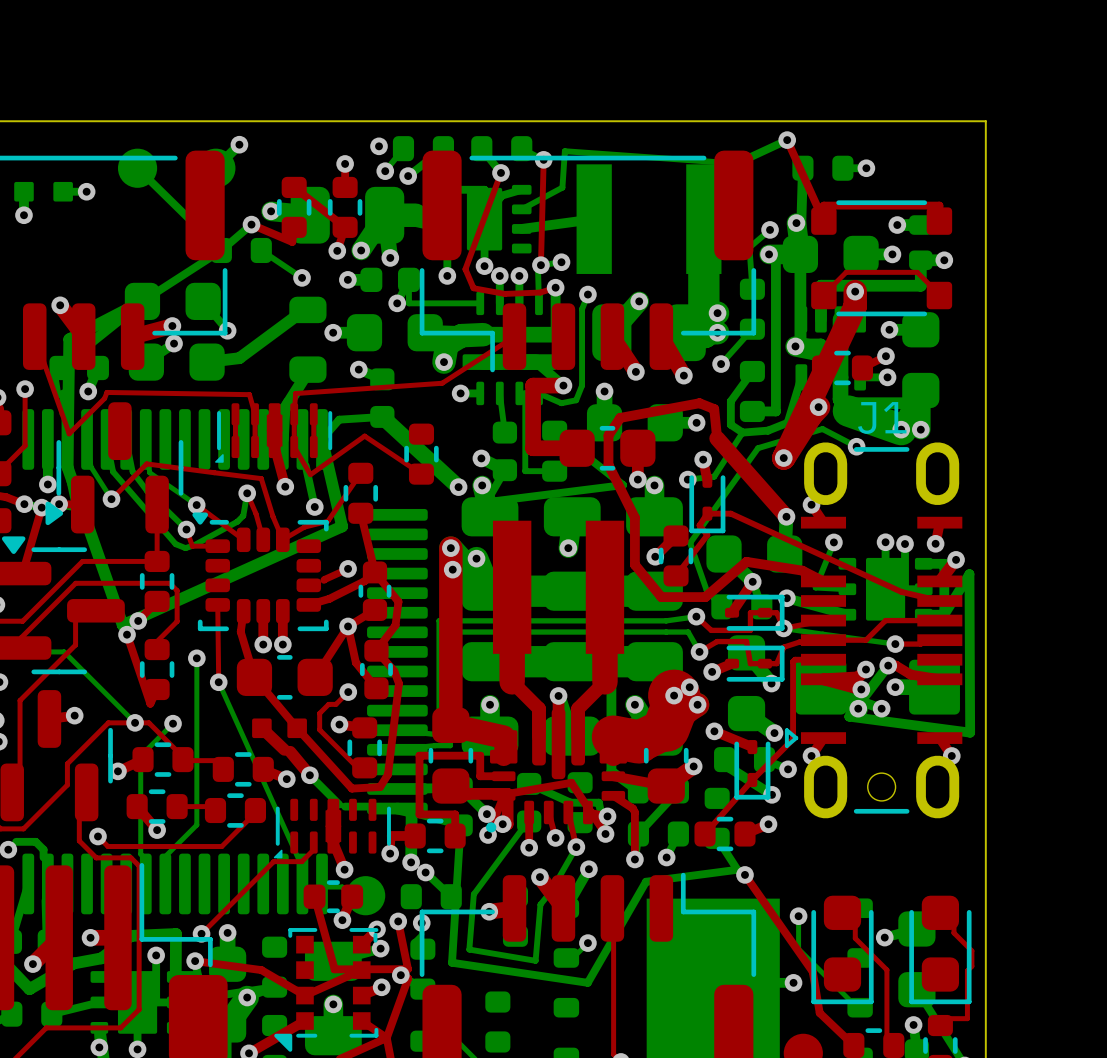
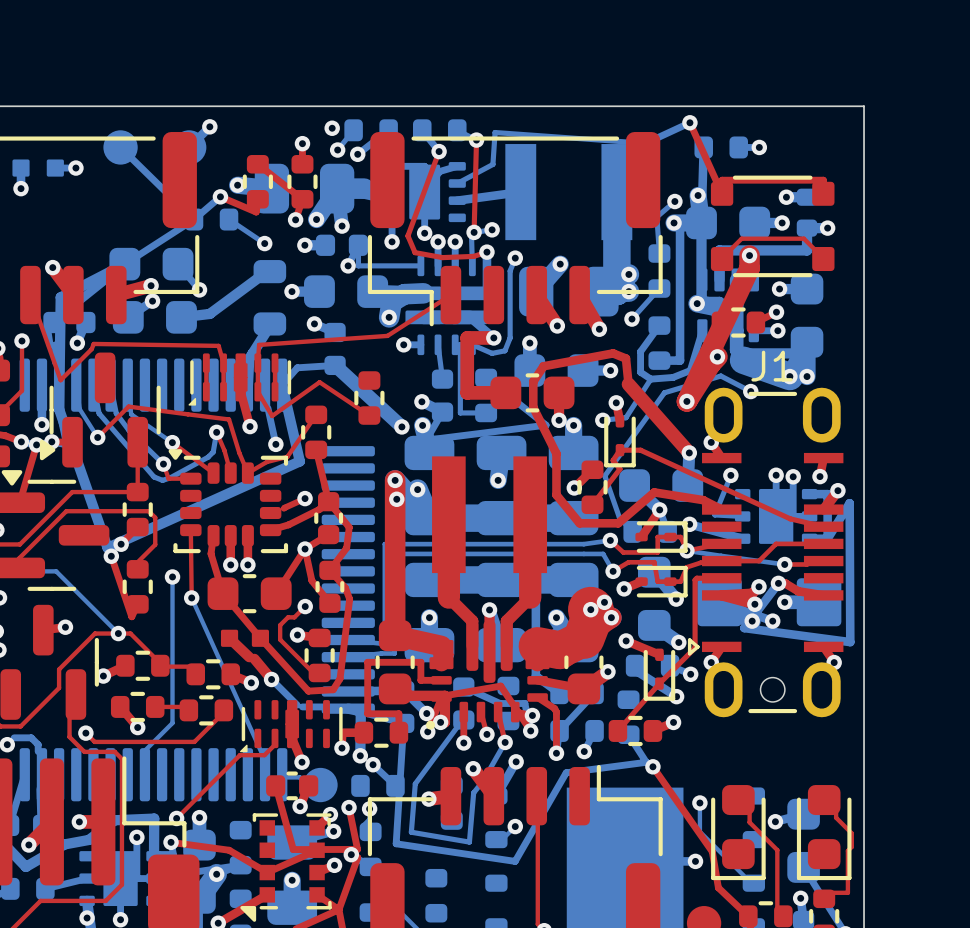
top track: (75, 620) (75, 645) (20, 700) (20, 767) -> none
bottom track: (173, 723) (140, 755) (140, 854) (142, 856) -> none
via: (173, 723) -> none

